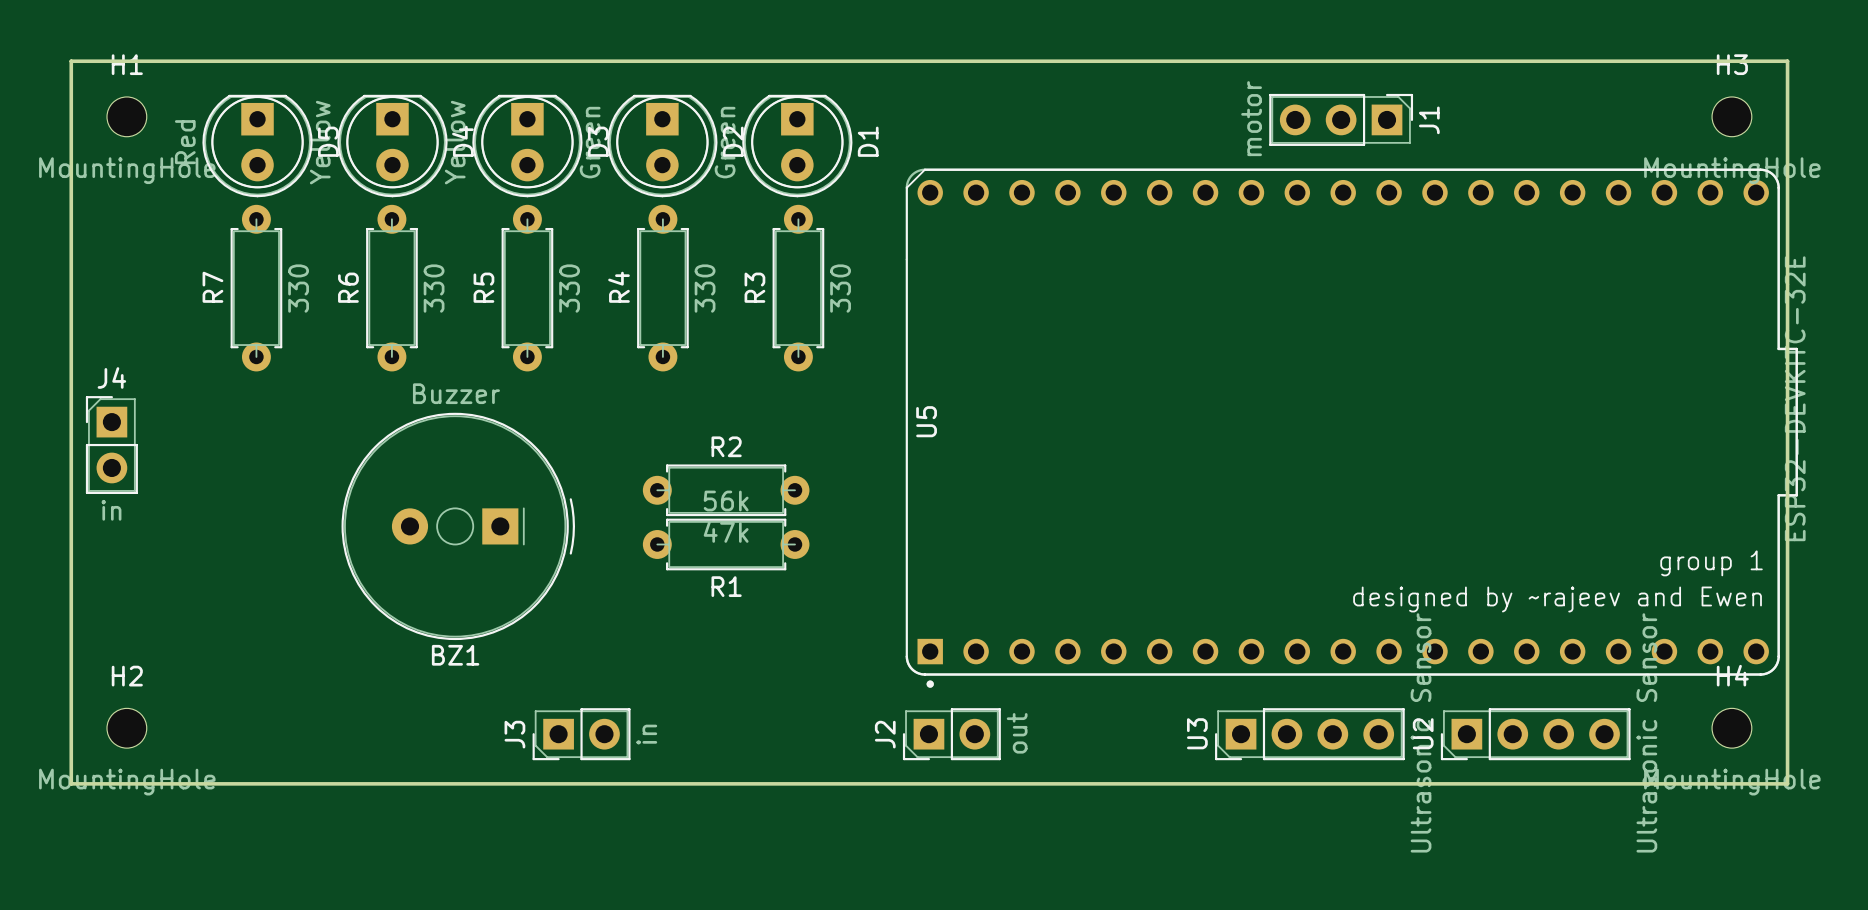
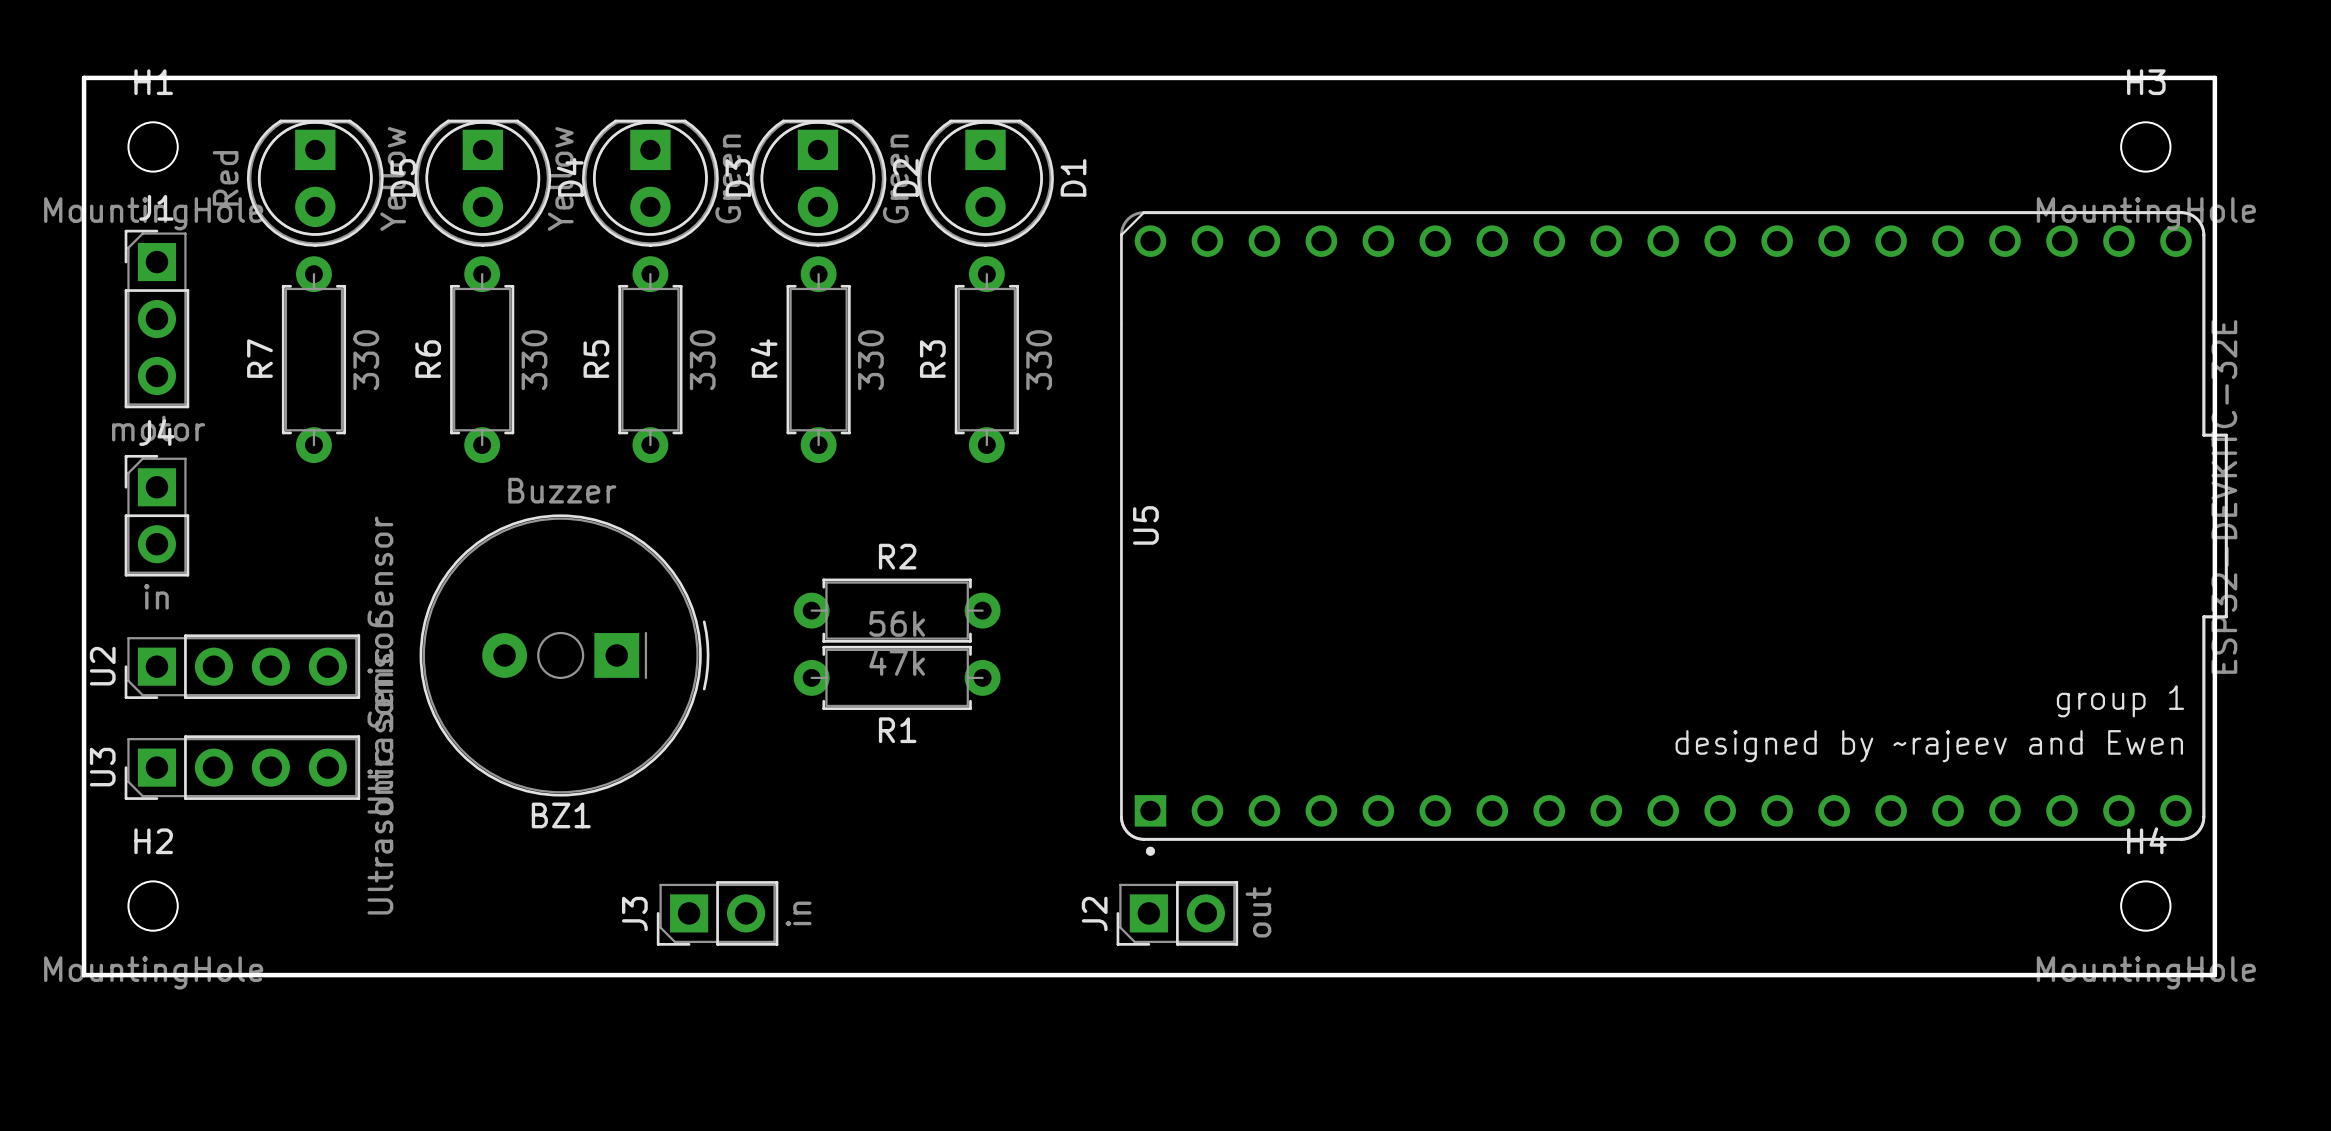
J1 rotation: 0° (1341, 119) -> 90° counterclockwise (156, 319)
J1 position: (1341, 119) -> (156, 319)
J4 position: (111, 445) -> (156, 515)
U3 position: (1309, 734) -> (242, 767)
U2 position: (1535, 734) -> (242, 666)

